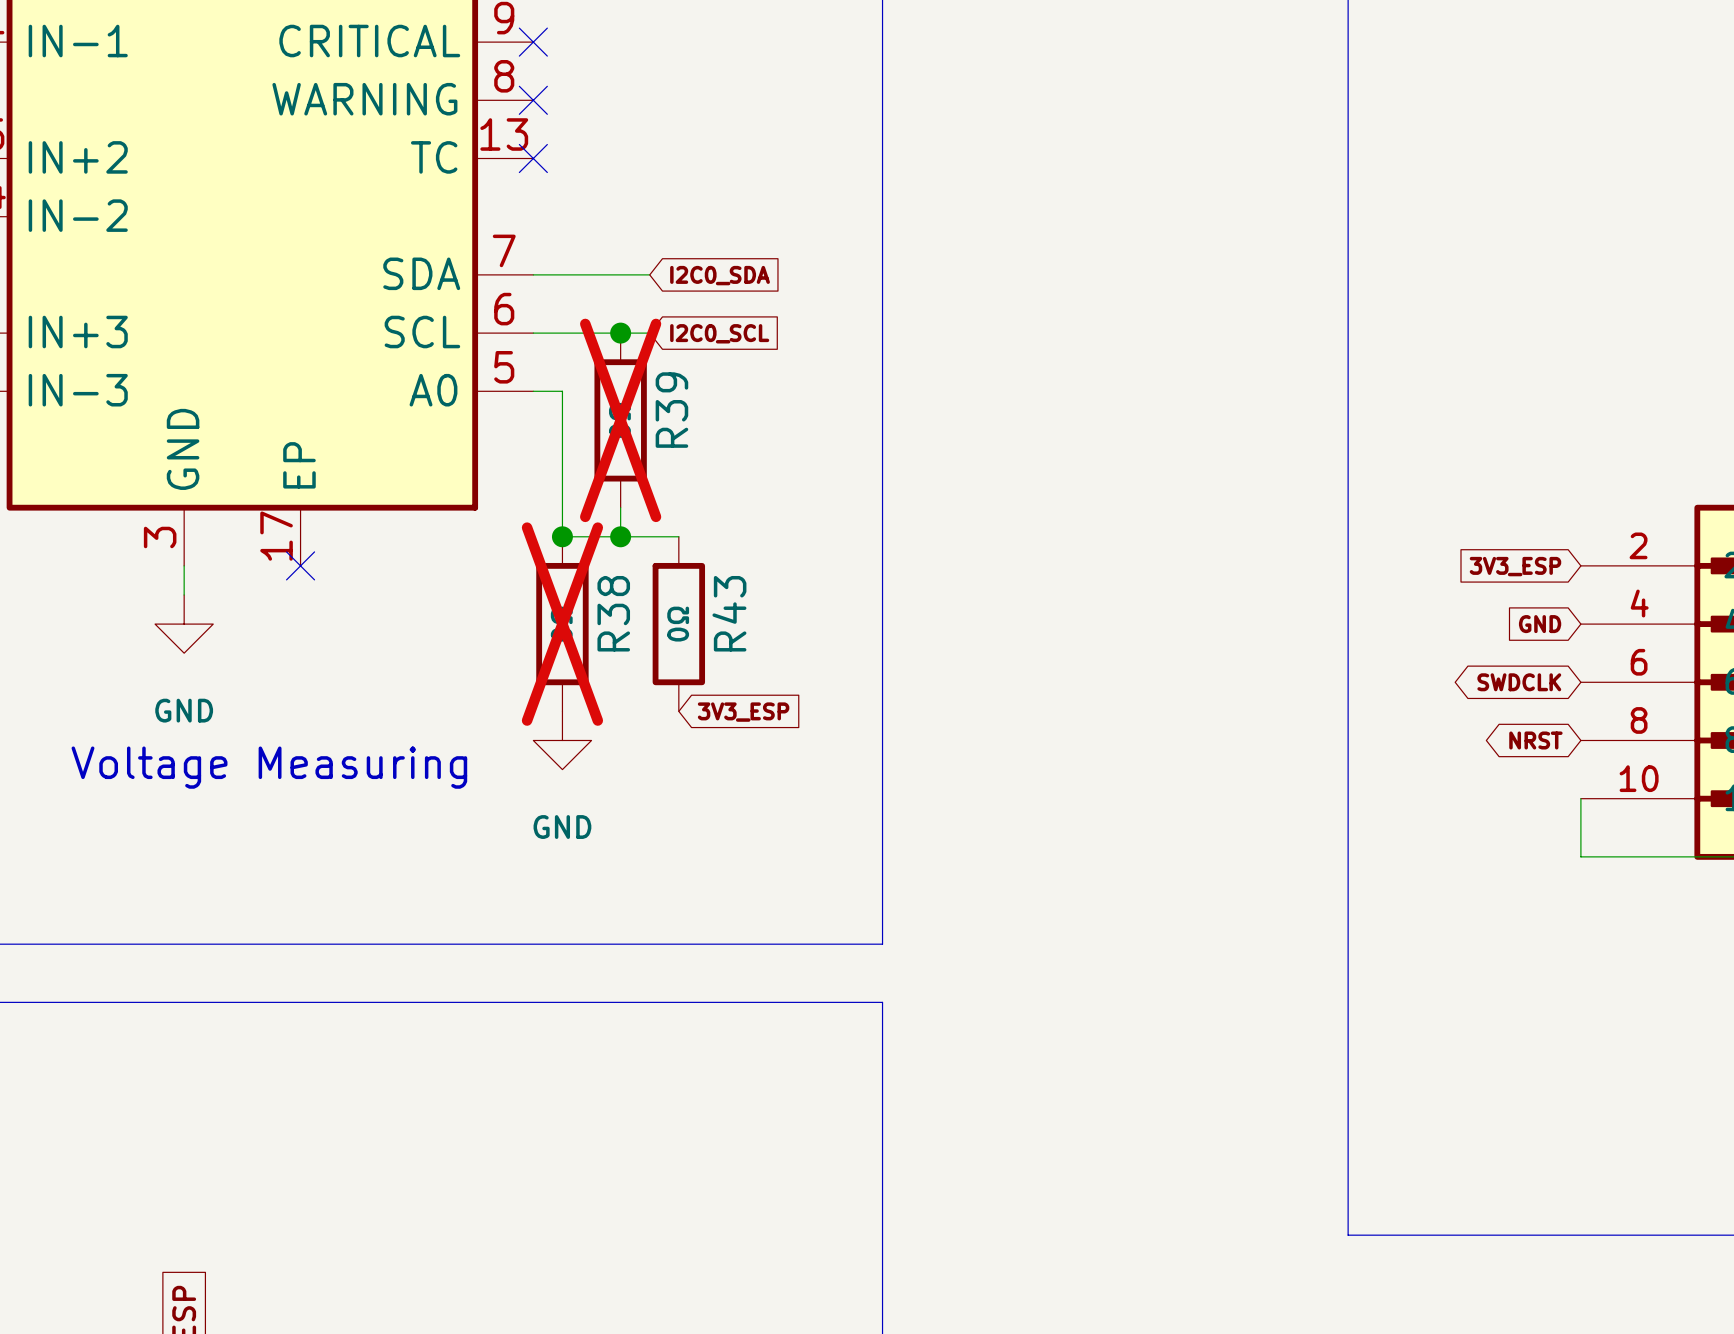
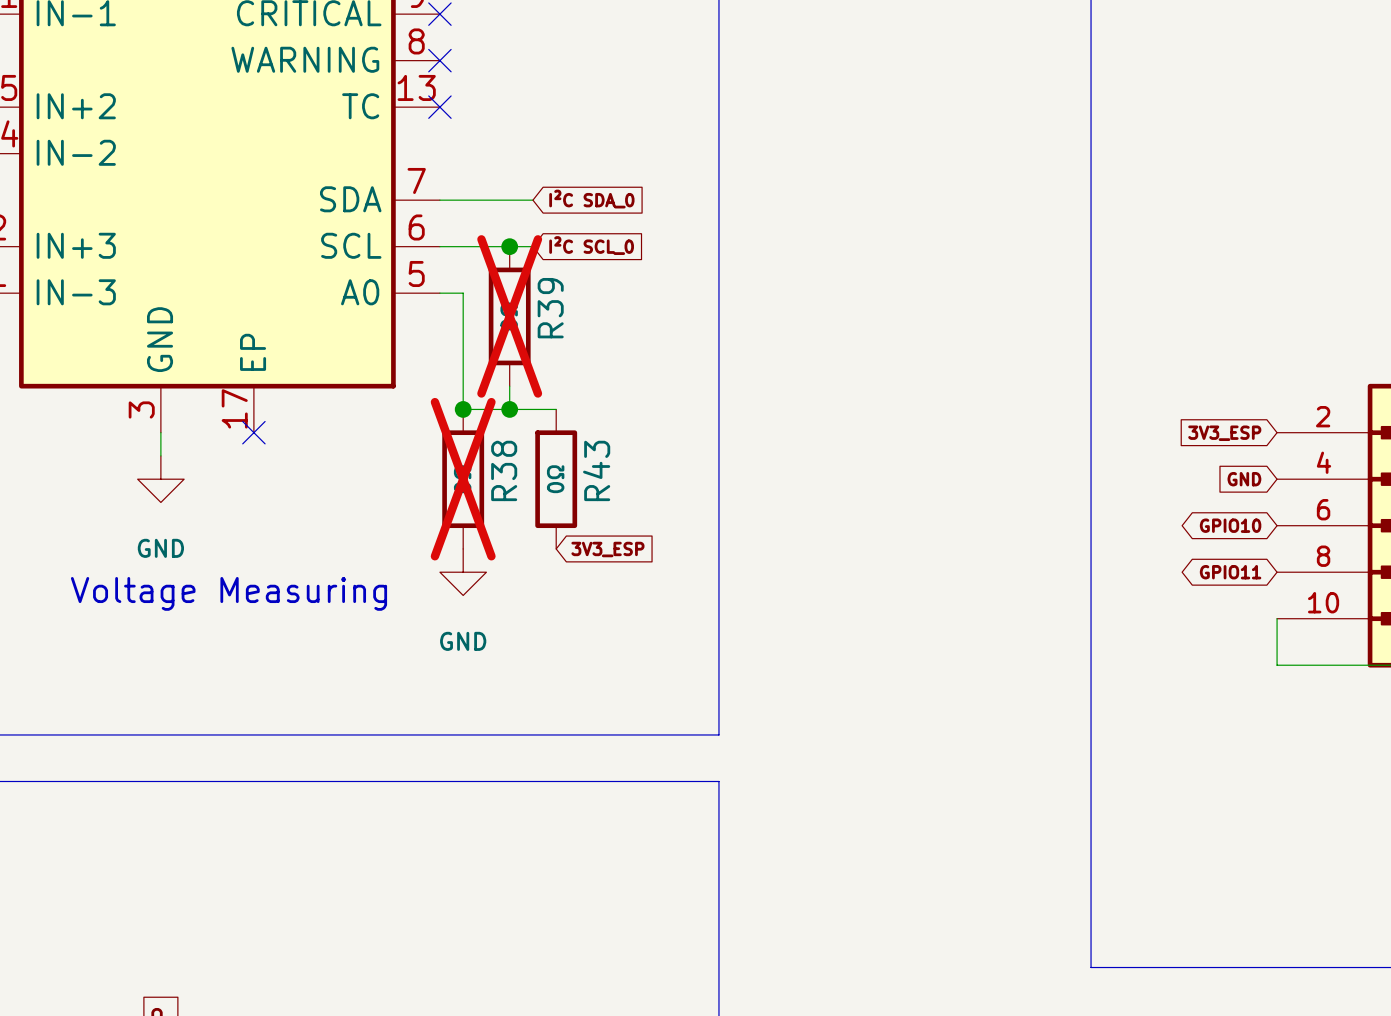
global label: I2C0_SDA (720, 275) -> I²C SDA_0 (591, 199)
global label: I2C0_SCL (719, 333) -> I²C SCL_0 (591, 245)
global label: SWDCLK (1519, 682) -> GPIO10 (1230, 525)
global label: NRST (1535, 740) -> GPIO11 (1230, 572)

